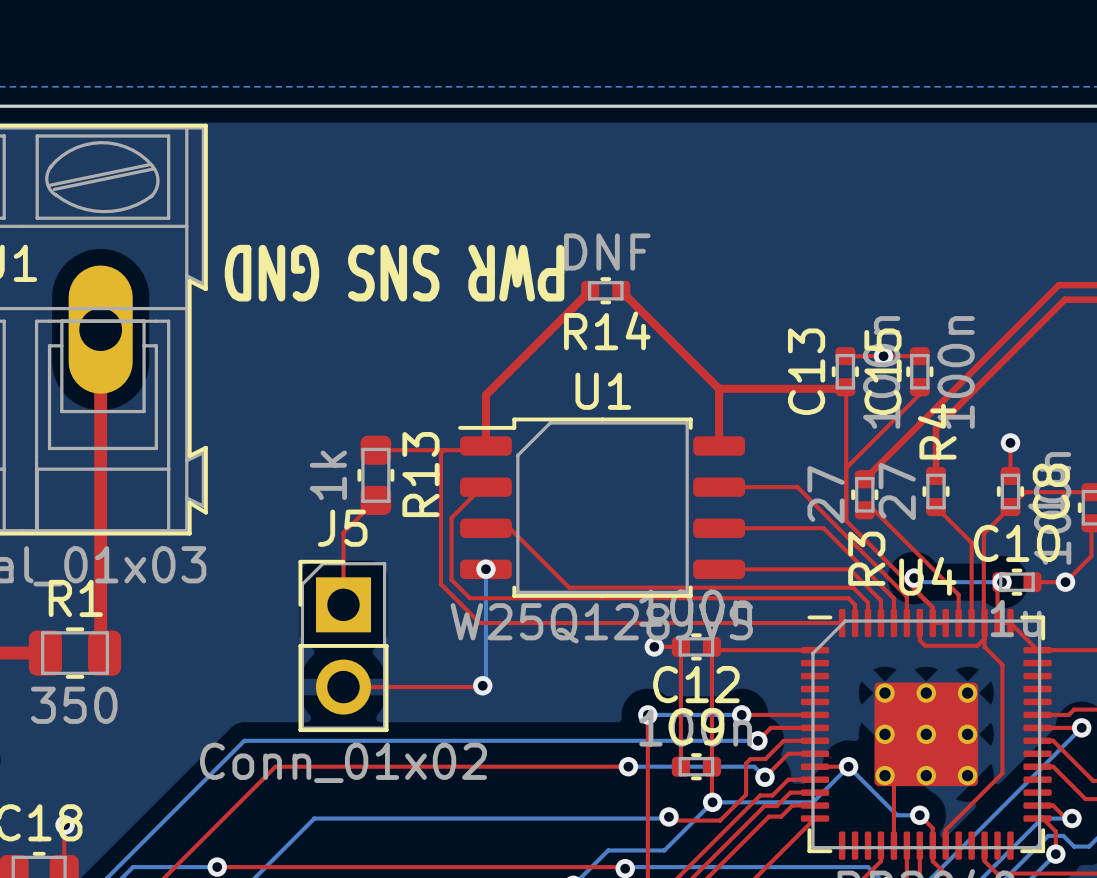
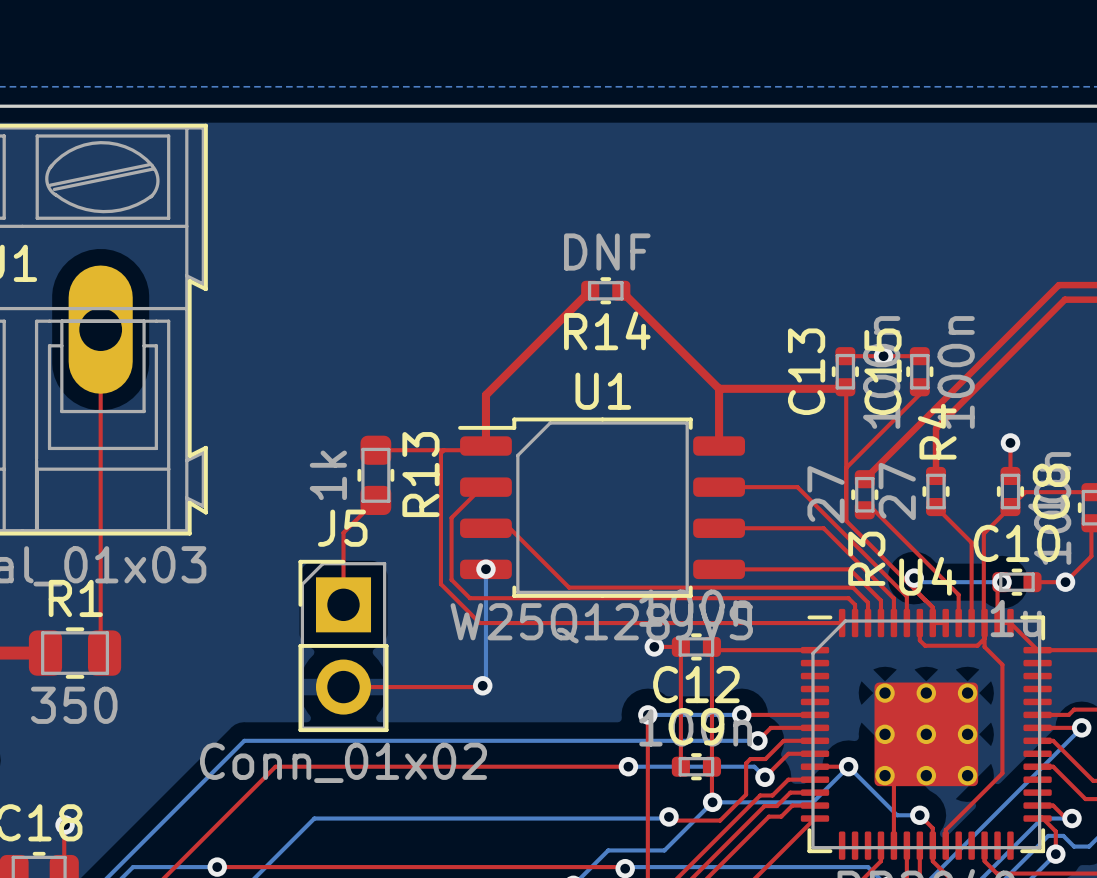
text: PWR SNS GND (394, 273) -> none
top track width: thick (100, 329) (100, 649) -> thin (100, 329) (100, 649)

